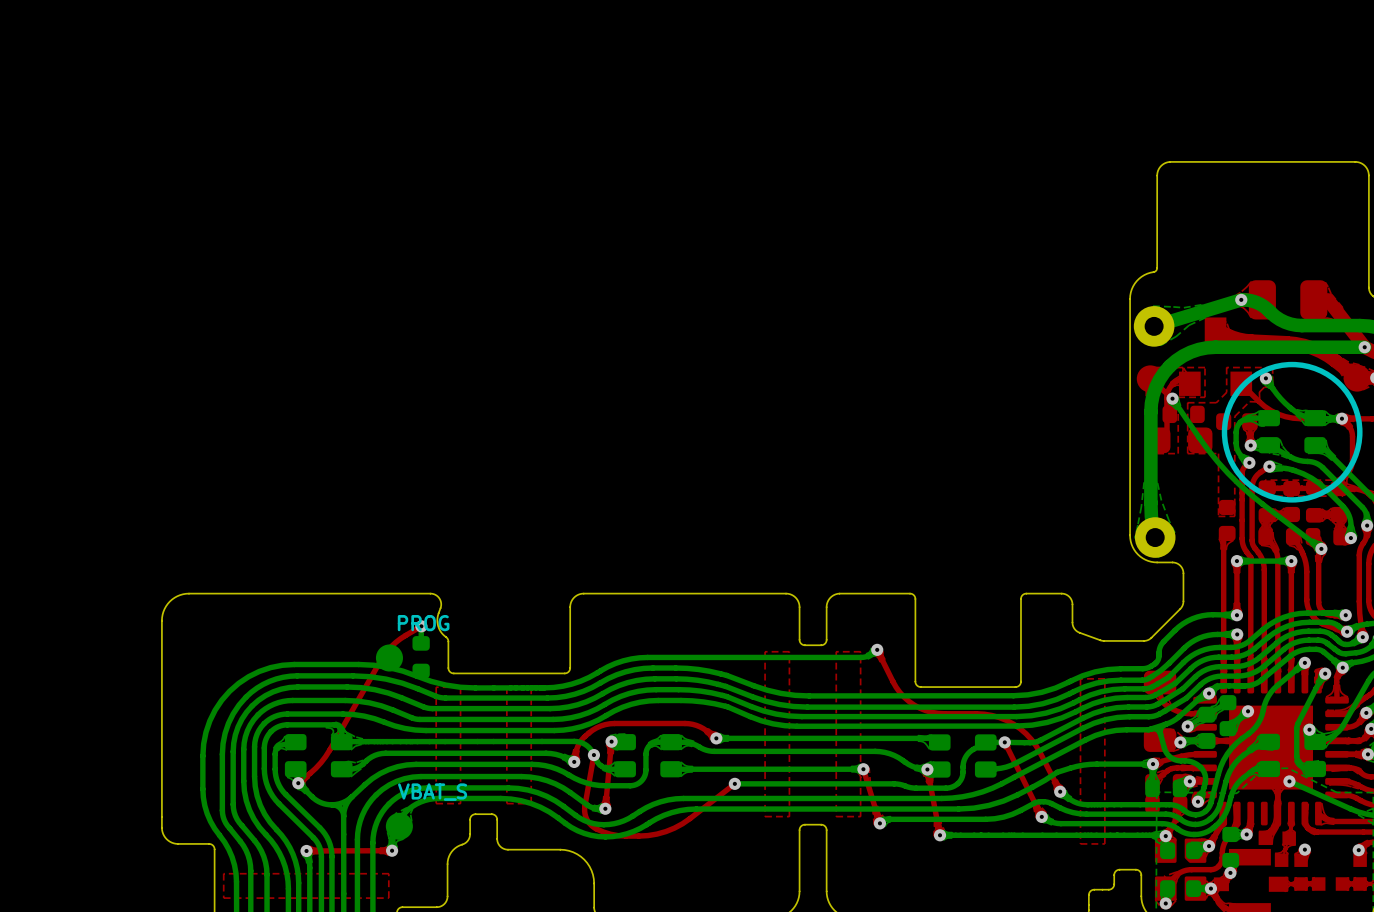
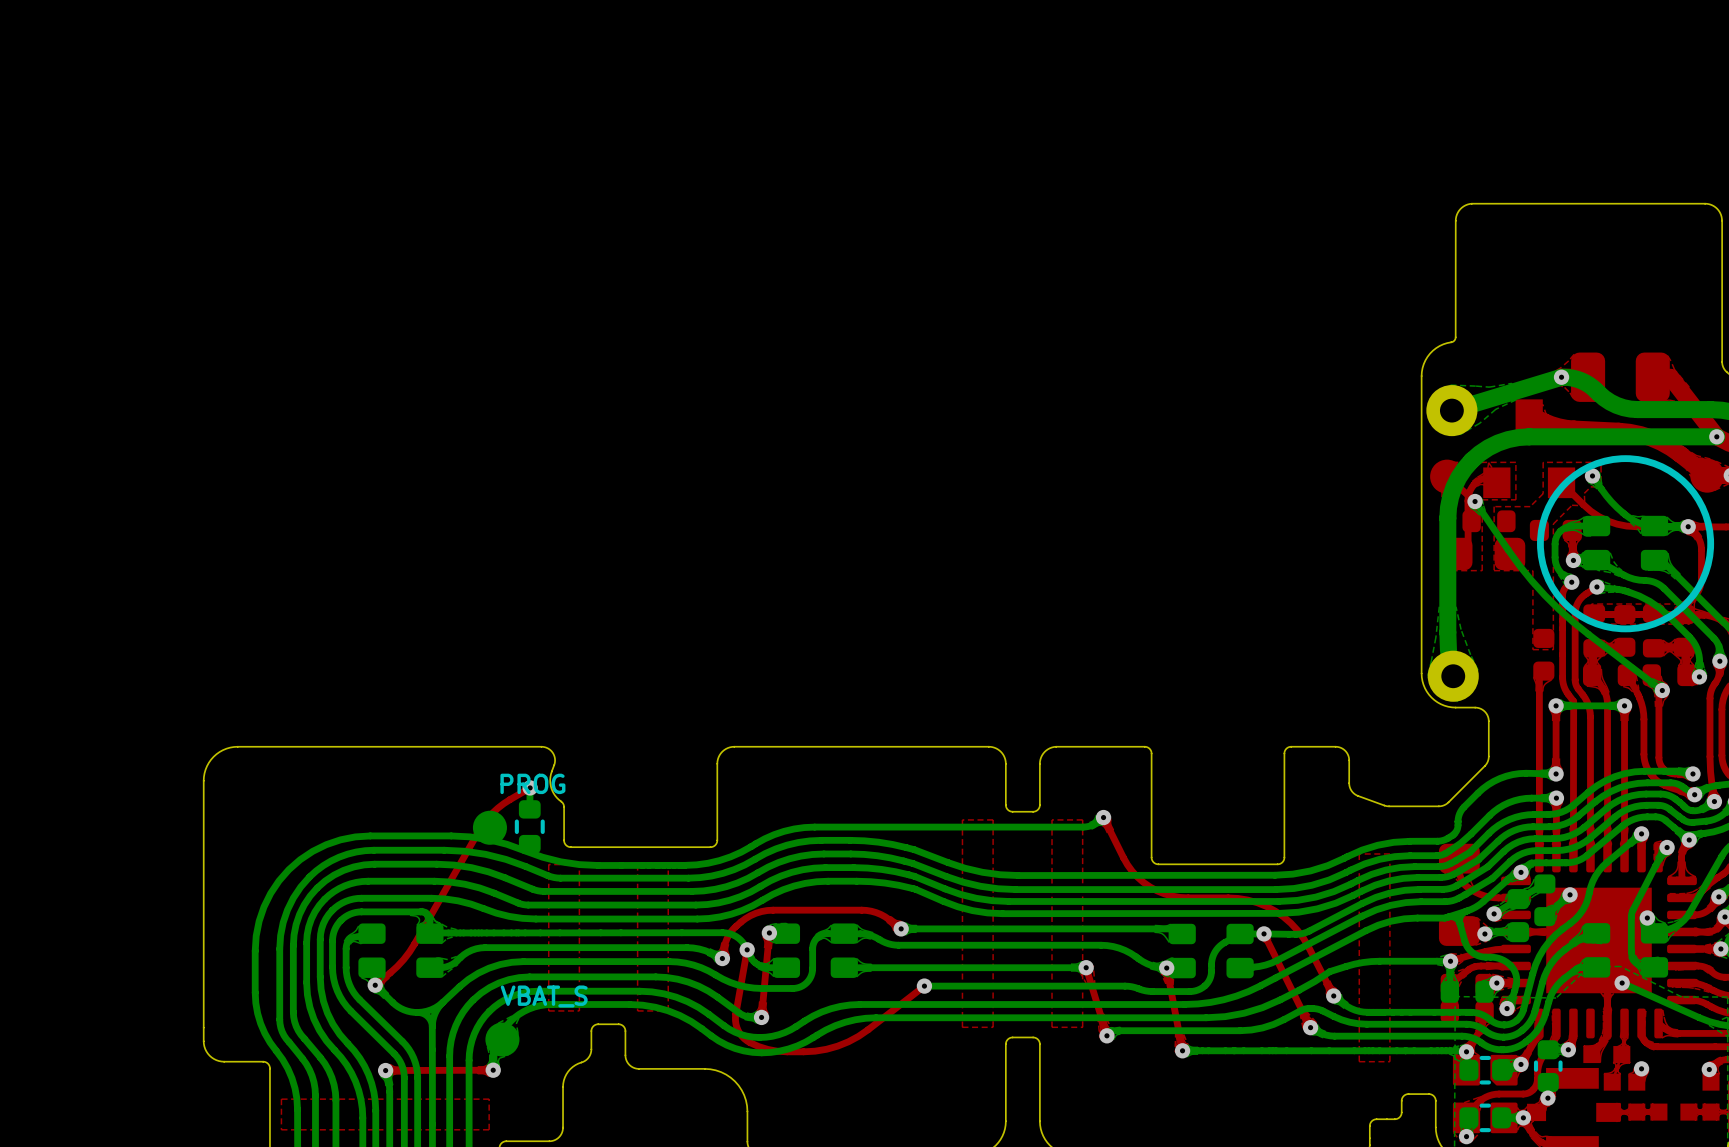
part footprint: [412, 636, 430, 679] -> [514, 800, 545, 854]
part footprint: [1222, 826, 1240, 869] -> [1533, 1040, 1563, 1093]
part footprint: [1160, 842, 1202, 860] -> [1459, 1055, 1512, 1085]
part footprint: [1160, 880, 1202, 898] -> [1459, 1103, 1512, 1133]

